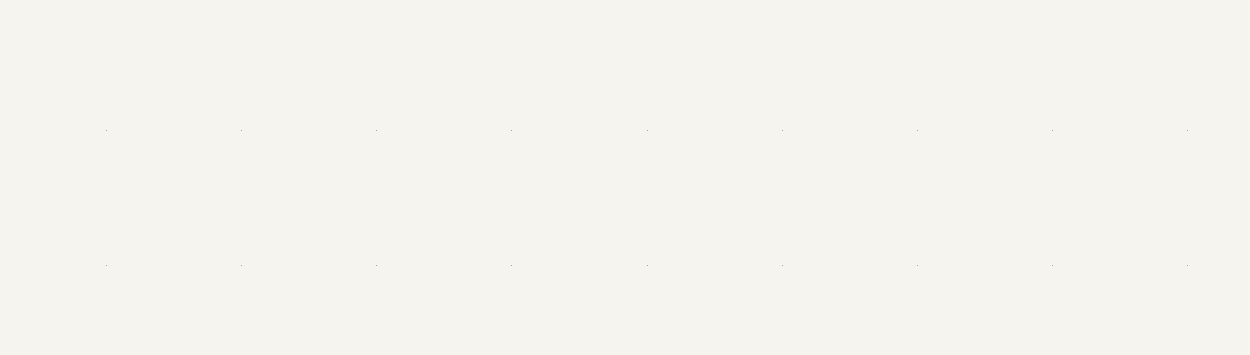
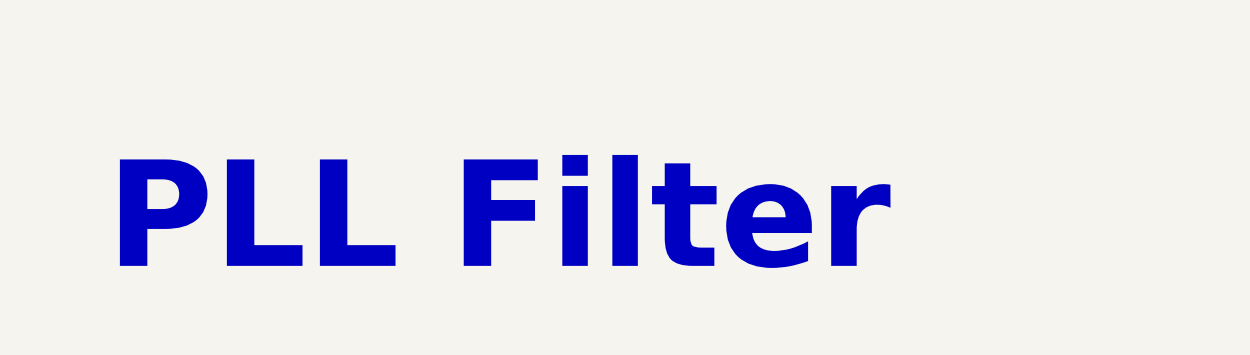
text: none -> PLL Filter (505, 211)

